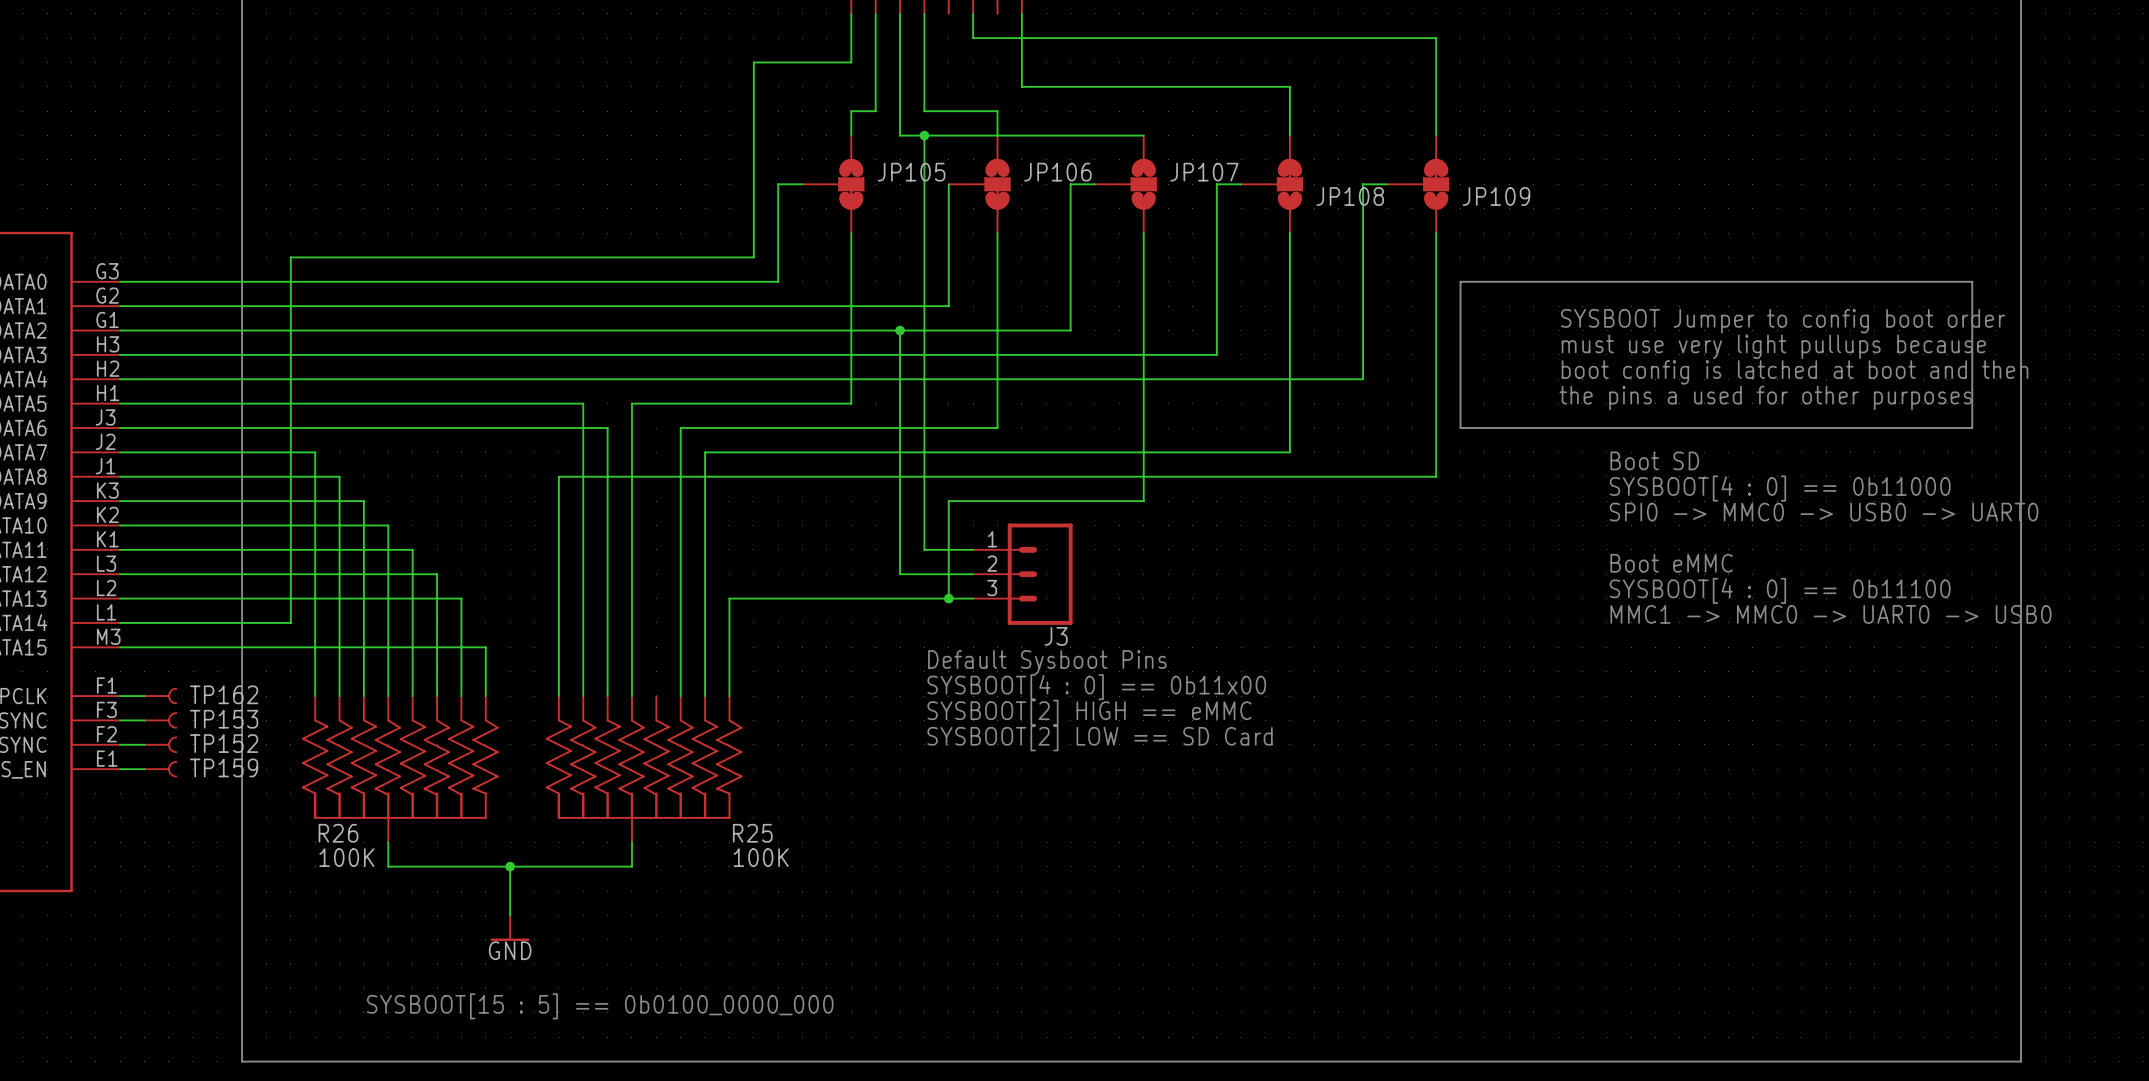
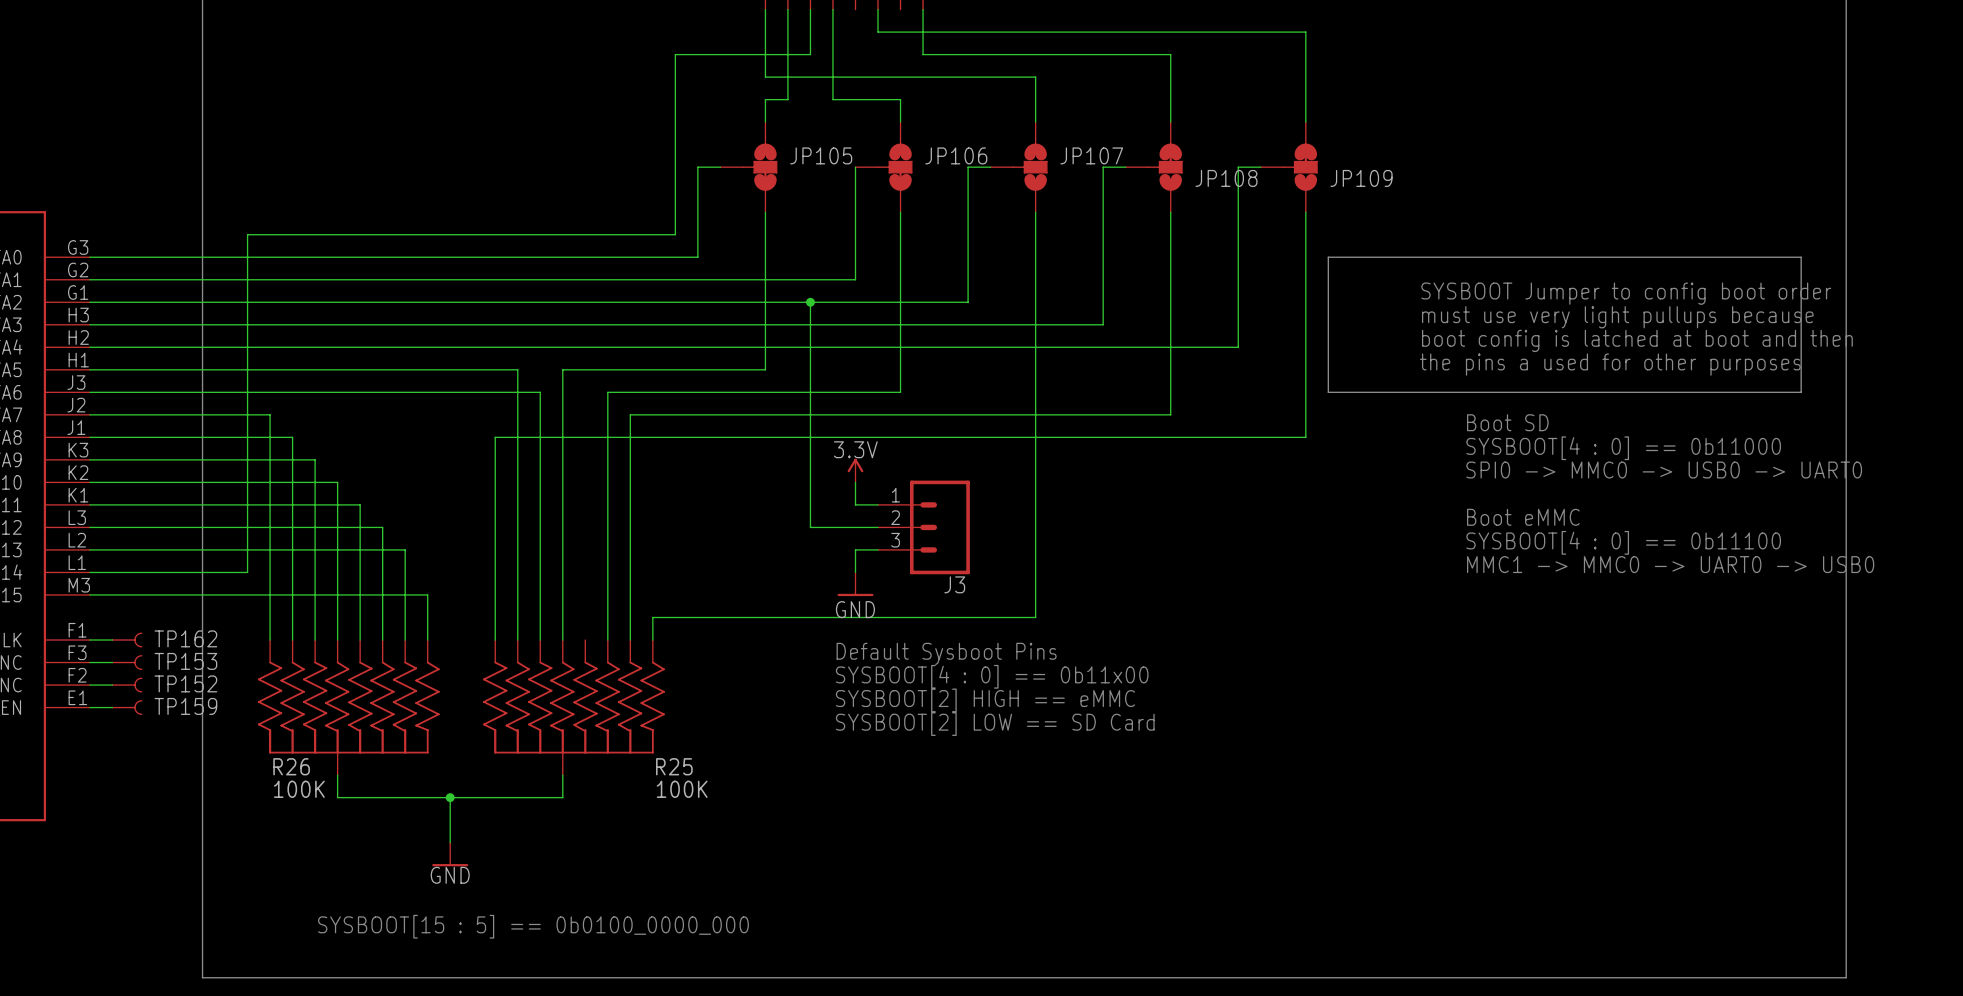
wire: (900, 62) (900, 135) (1143, 135) -> (1035, 77) (1035, 122)
wire: (1021, 62) (1021, 86) -> (810, 54) (765, 54) (765, 77) (923, 77)
wire: (1143, 86) (1289, 86) -> (923, 54) (1170, 54) (1170, 77)
wire: (924, 135) (924, 549) (948, 549) (948, 598) (729, 598) (729, 671) -> none
junction: (924, 135) -> none
wire: (1143, 501) (948, 501) (948, 525) -> (1035, 459) (1035, 617) (652, 617)
power symbol: none -> 3.3V (855, 470)
wire: none -> (855, 549) (855, 572)
junction: (948, 598) -> none
power symbol: none -> GND (855, 584)
text position: Default Sysboot Pins (1047, 662) -> Default Sysboot Pins (946, 653)
text position: SYSBOOT[4 : 0] == 0b11x00 (1096, 687) -> SYSBOOT[4 : 0] == 0b11x00 (992, 676)
text position: SYSBOOT[2] HIGH == eMMC (1089, 712) -> SYSBOOT[2] HIGH == eMMC (985, 700)
text position: SYSBOOT[2] LOW == SD Card (1100, 738) -> SYSBOOT[2] LOW == SD Card (995, 724)

